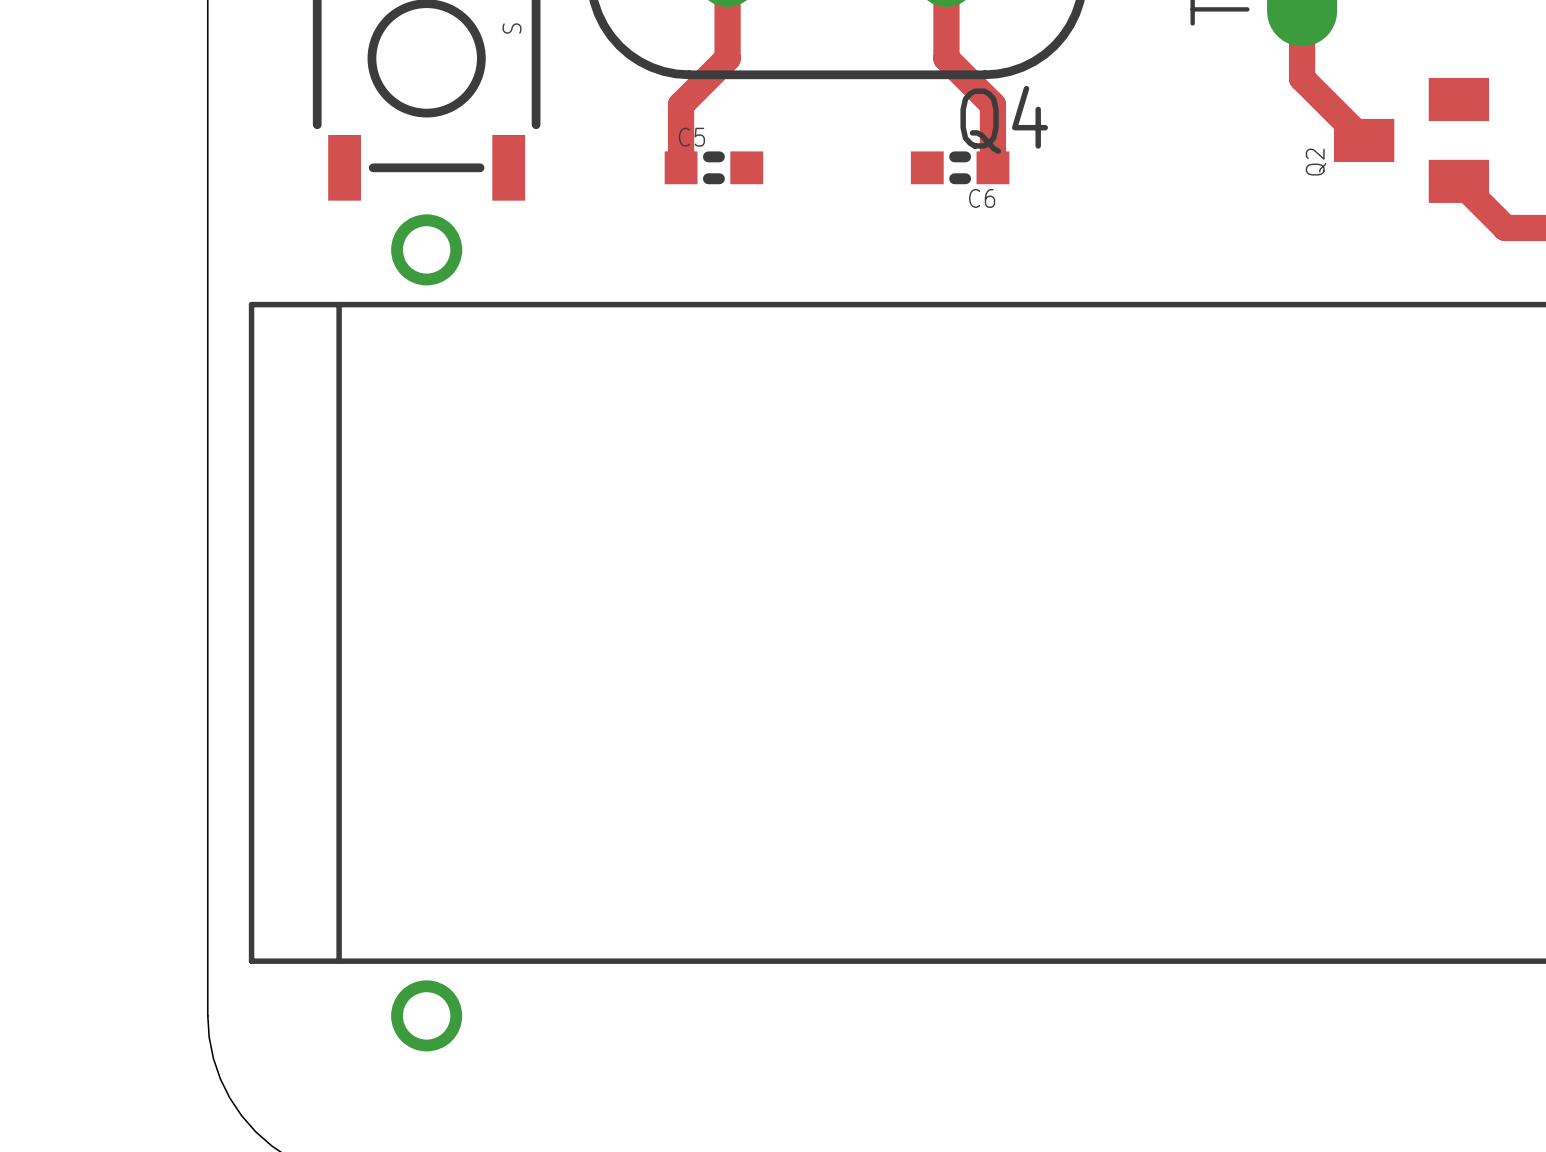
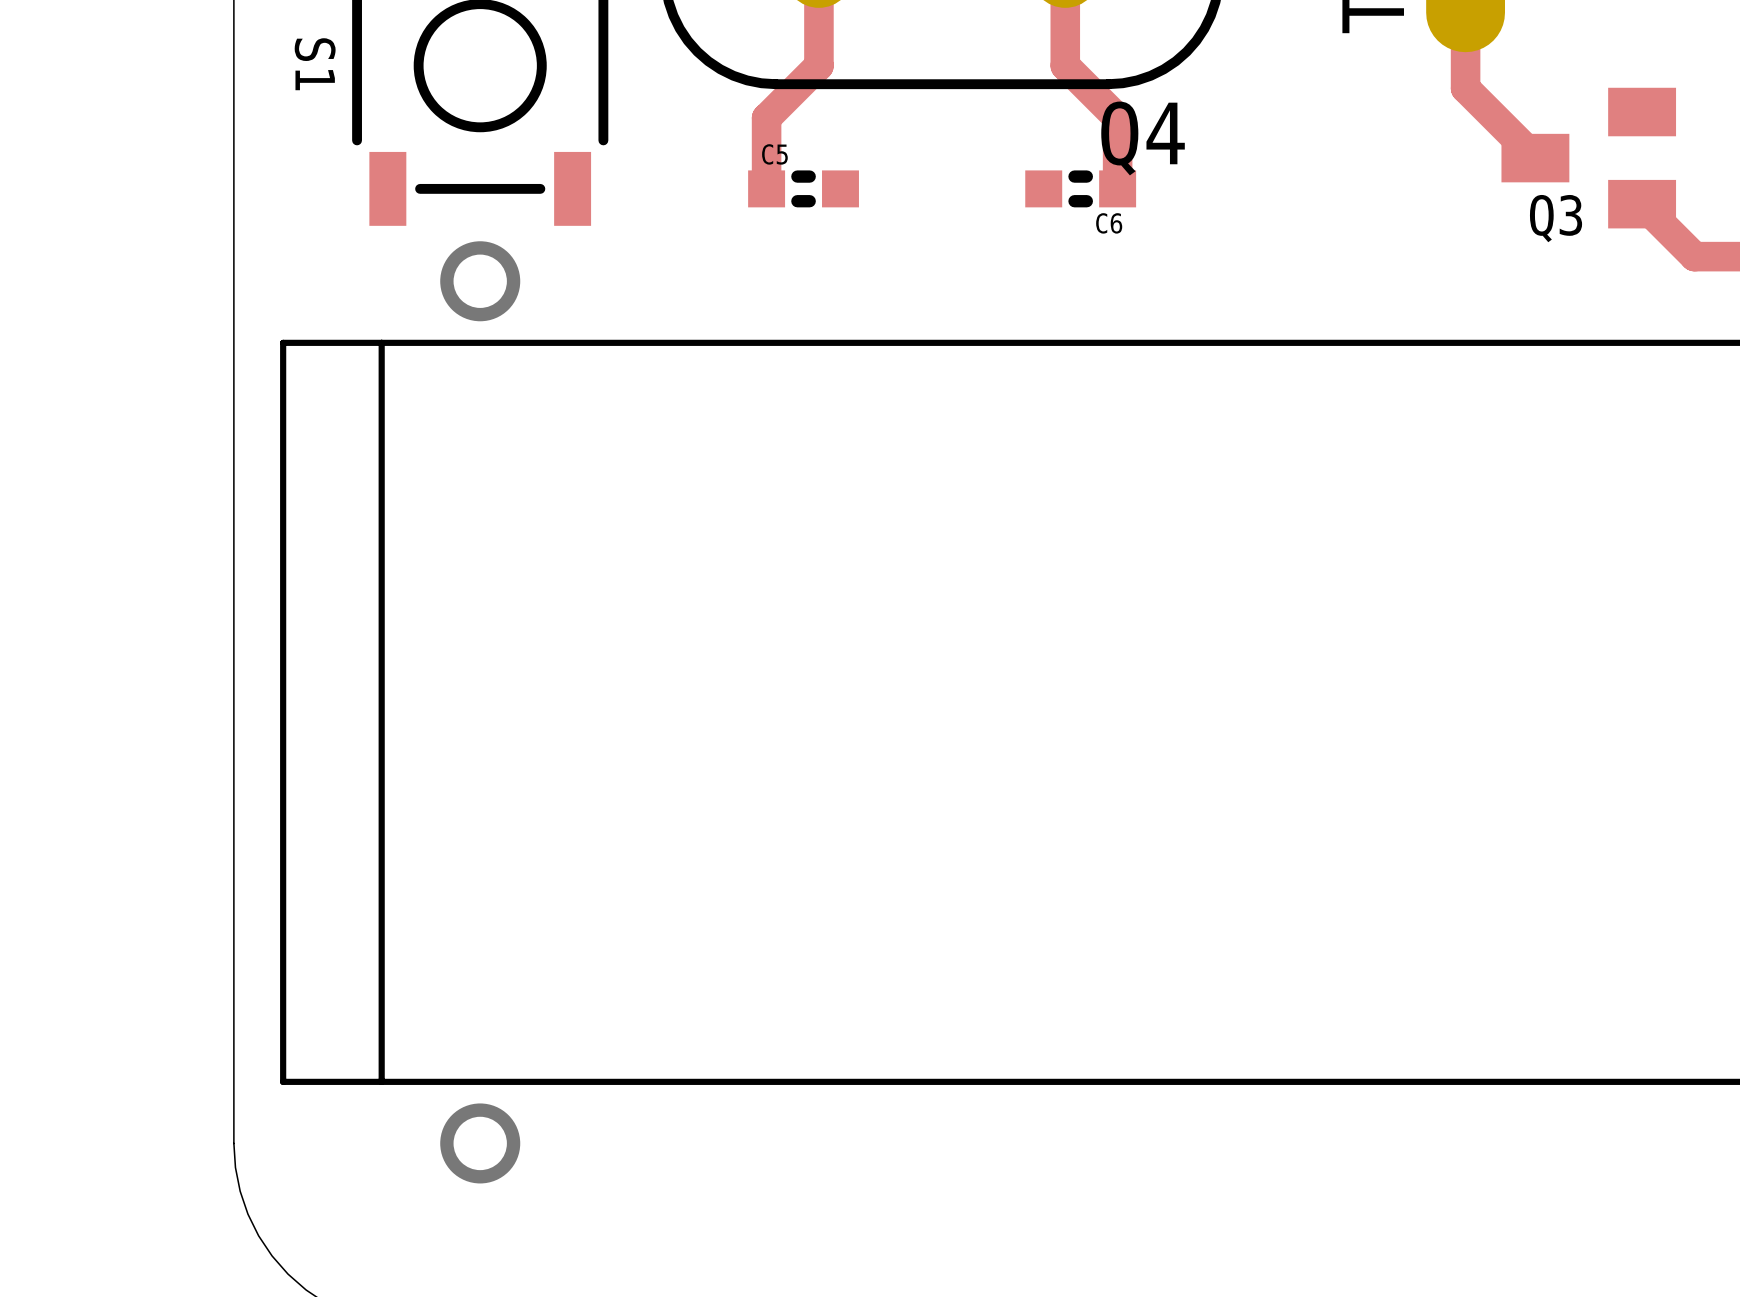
S name: S (512, 28) -> S1 (315, 64)
Q2 name: Q2 (1316, 162) -> Q3 (1556, 218)

